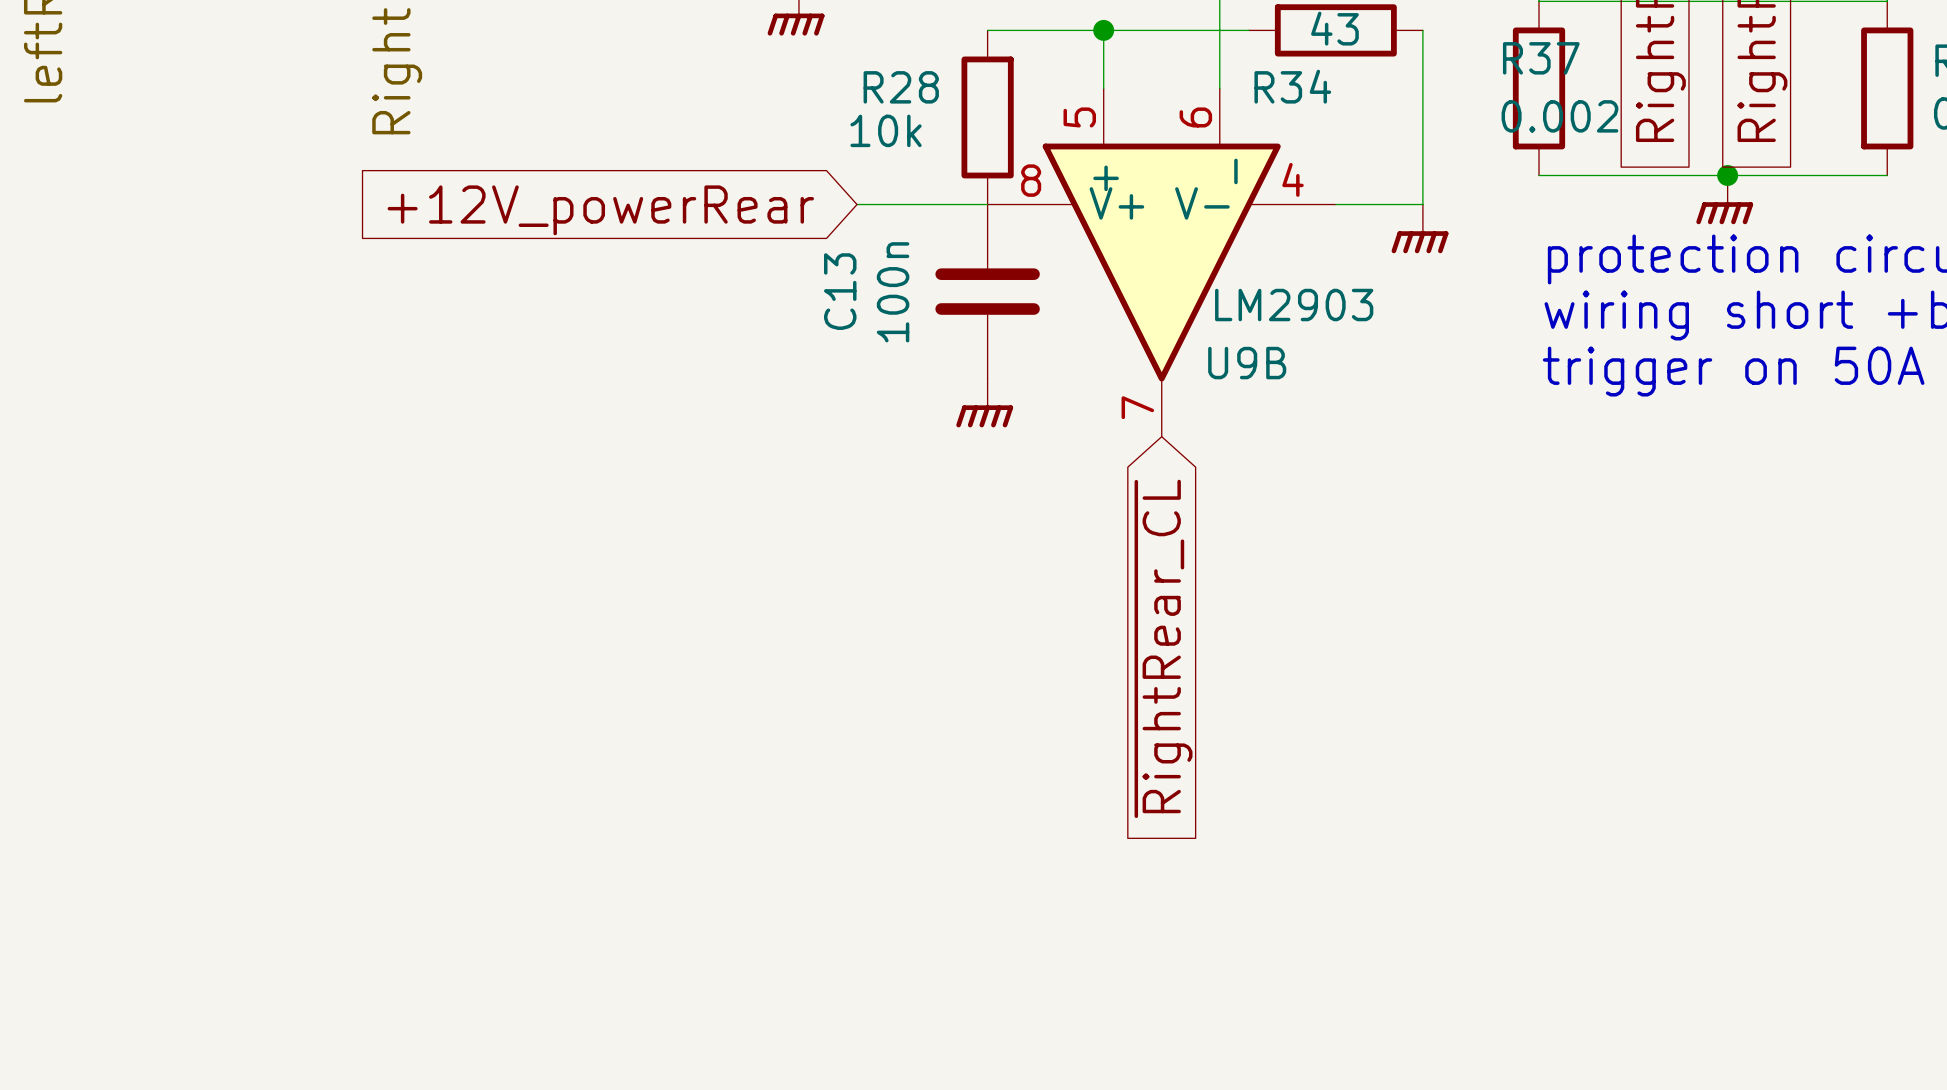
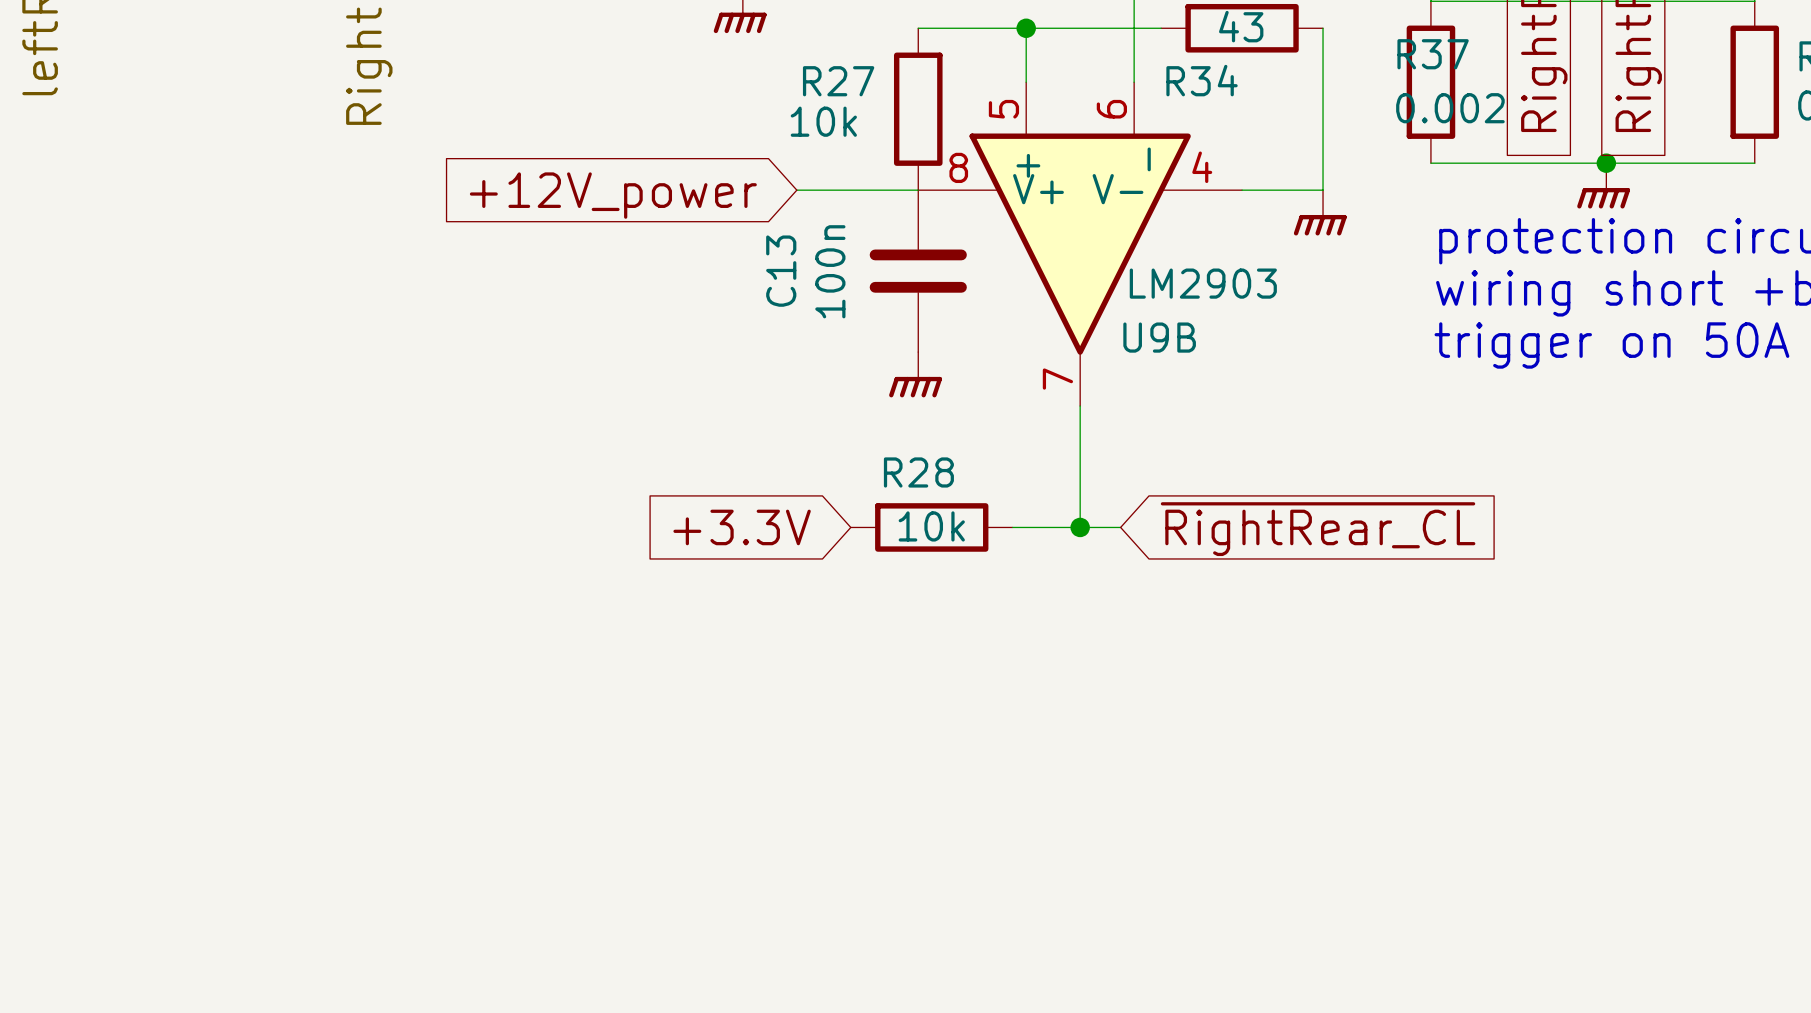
R28 name: R28 (901, 87) -> R27 (838, 81)
global label: +12V_powerRear (600, 210) -> +12V_power (613, 195)
wire: none -> (1080, 406) (1080, 527)
global label: none -> +3.3V (742, 527)
R28: none -> 10k (931, 527)
wire: none -> (1012, 527) (1120, 527)
junction: none -> (1080, 527)
global label rotation: 0° (1163, 648) -> 90° counterclockwise (1318, 529)

